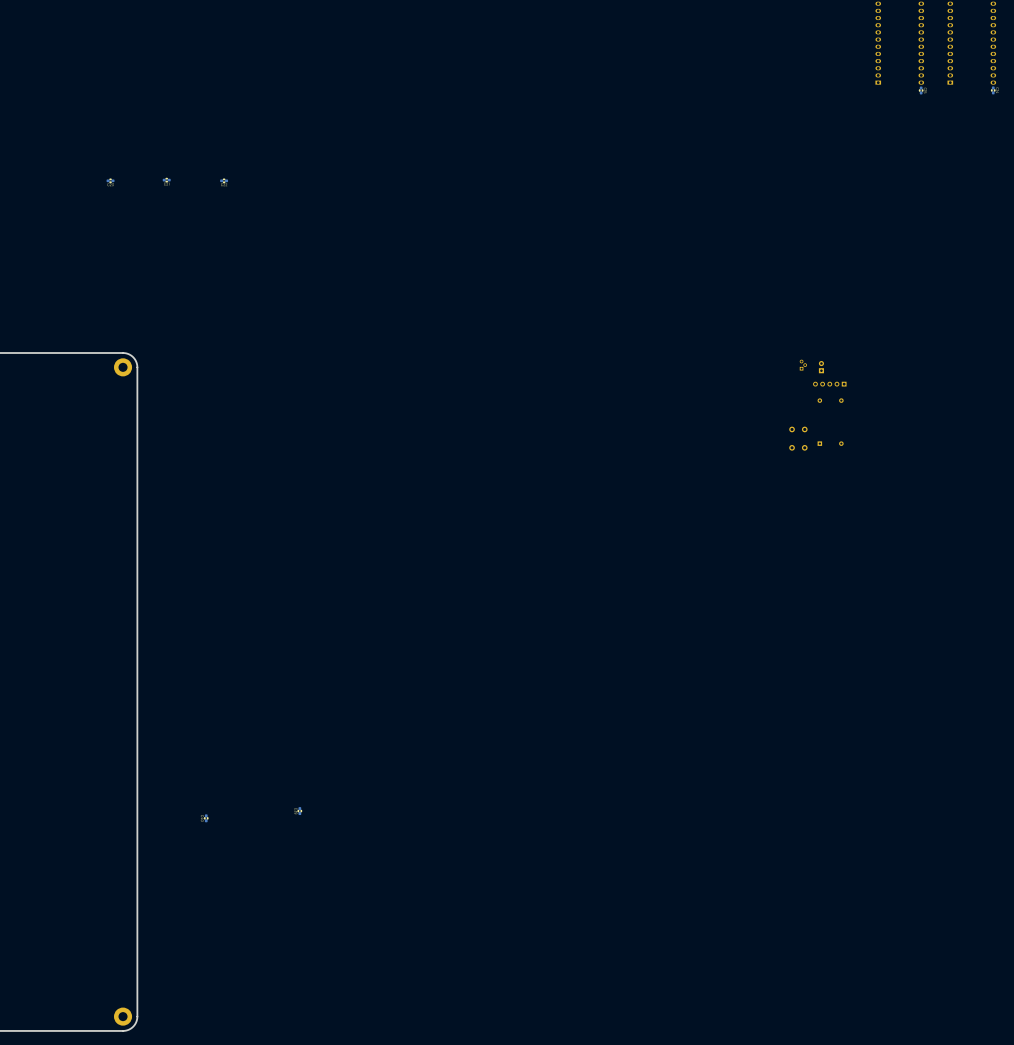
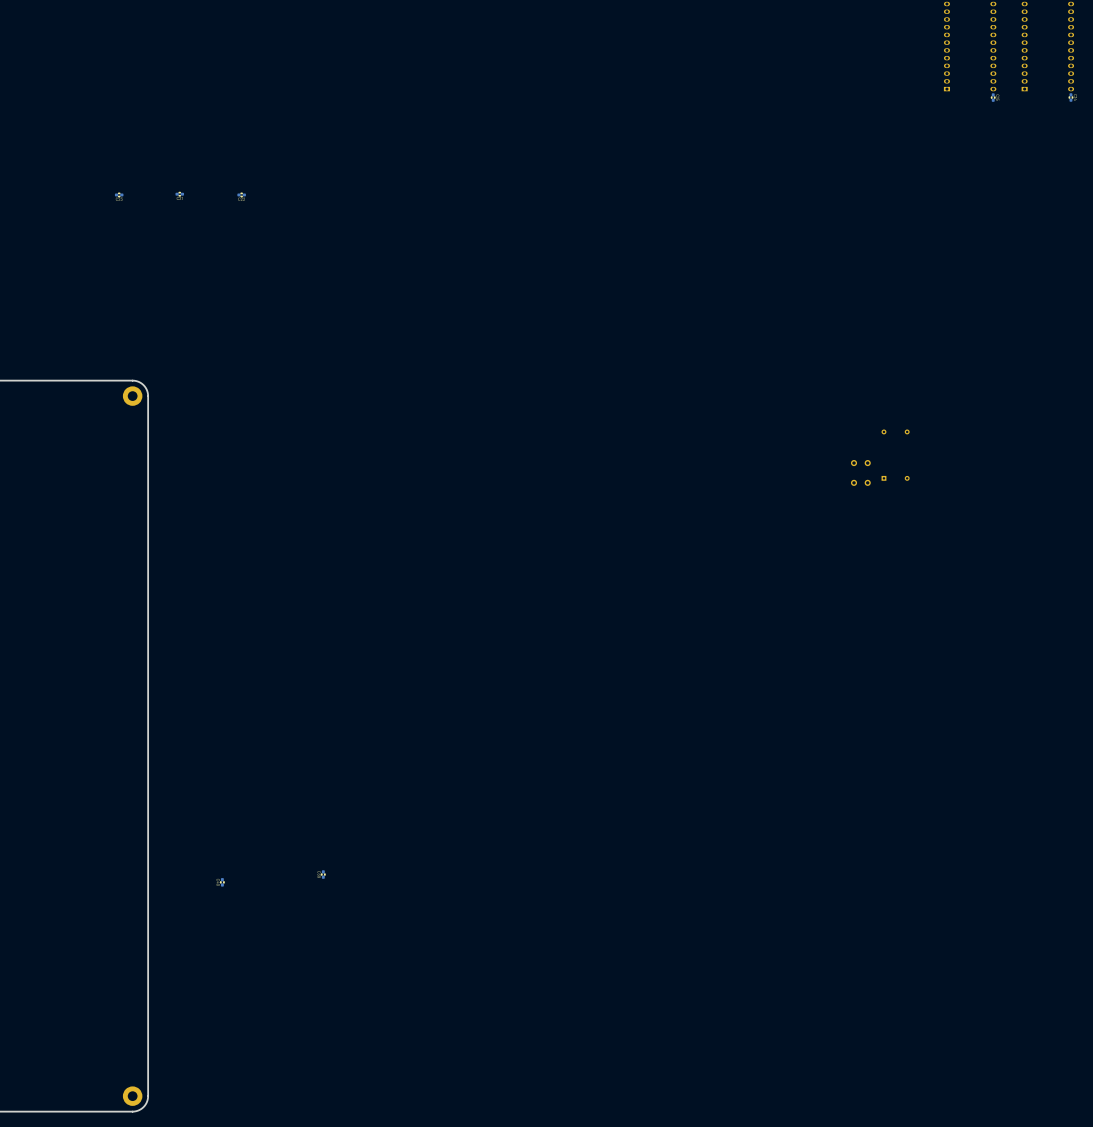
part: (803, 365) -> none
part: (821, 367) -> none
part: (829, 384) -> none

